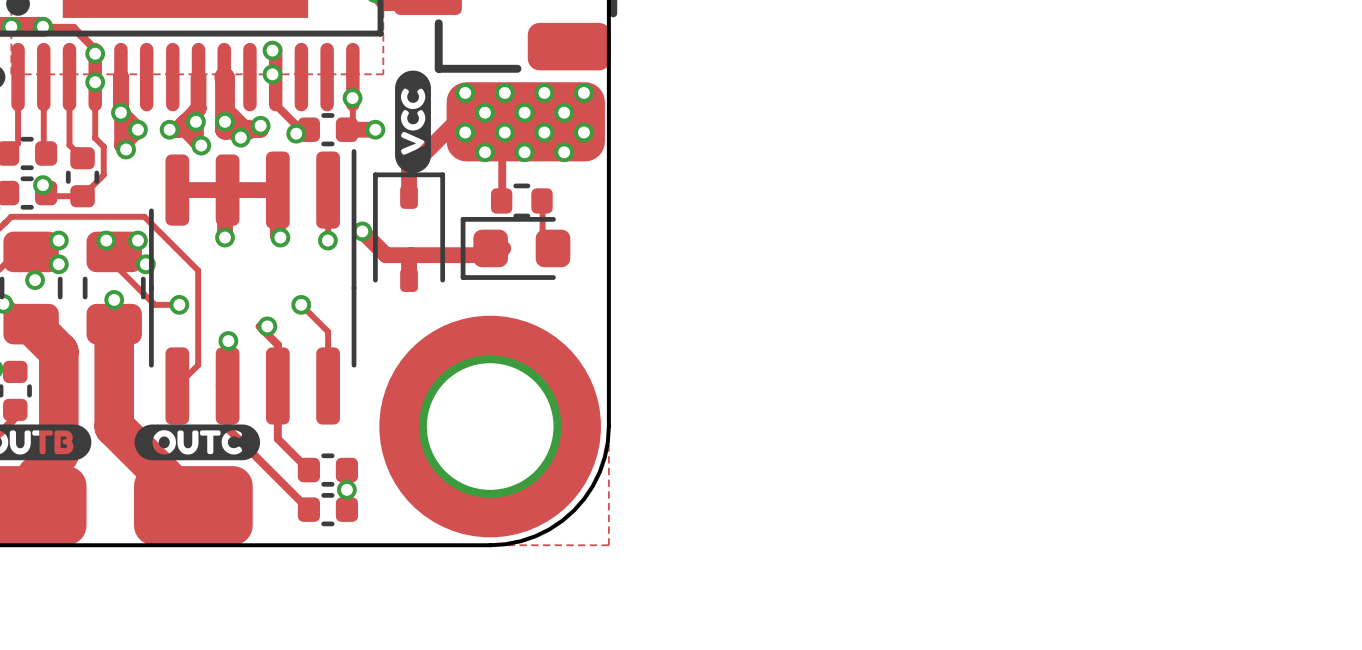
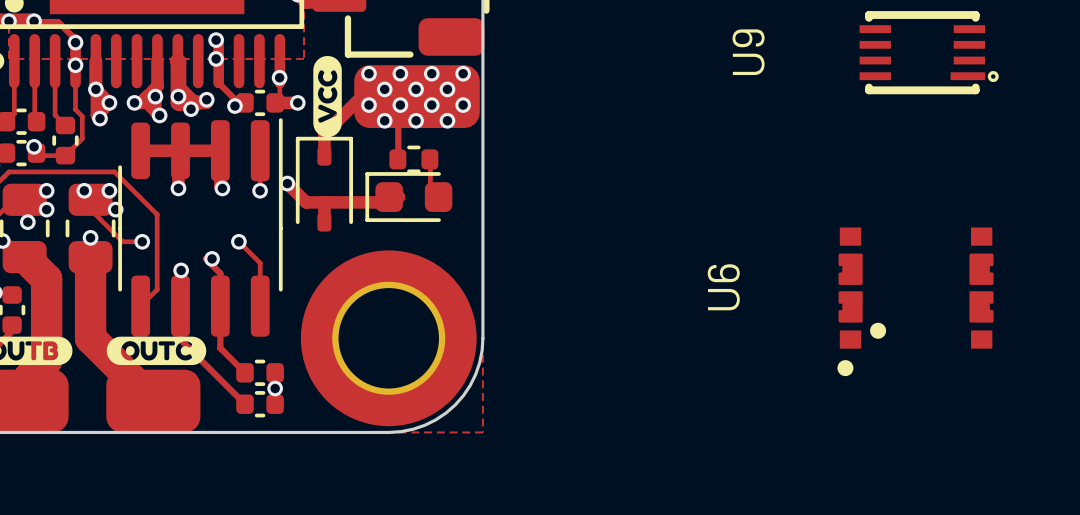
U9: none -> (929, 52)
U6: none -> (915, 301)

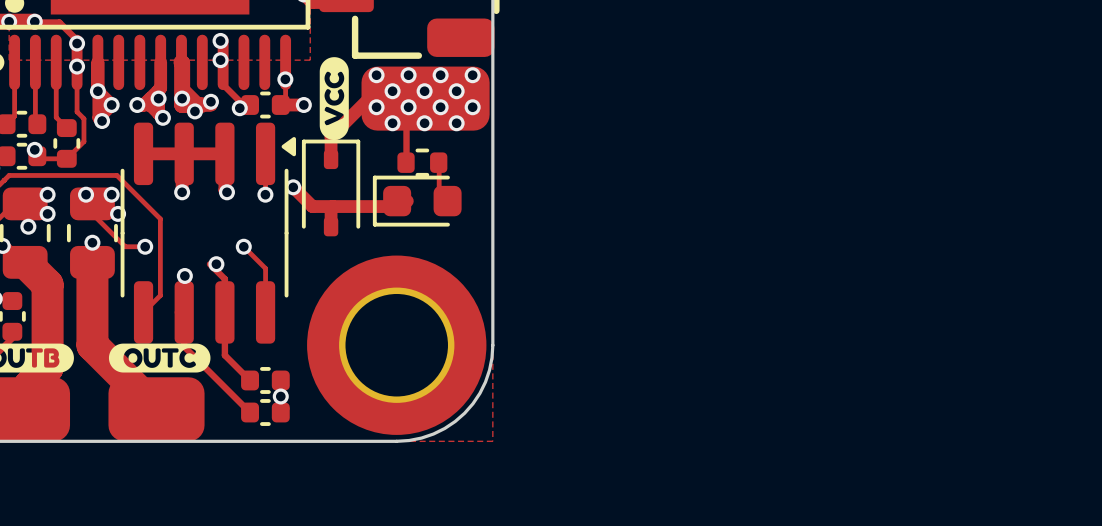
U9: (929, 52) -> none
part footprint: [118, 118, 283, 337] -> [120, 122, 297, 344]
U6: (915, 301) -> none

